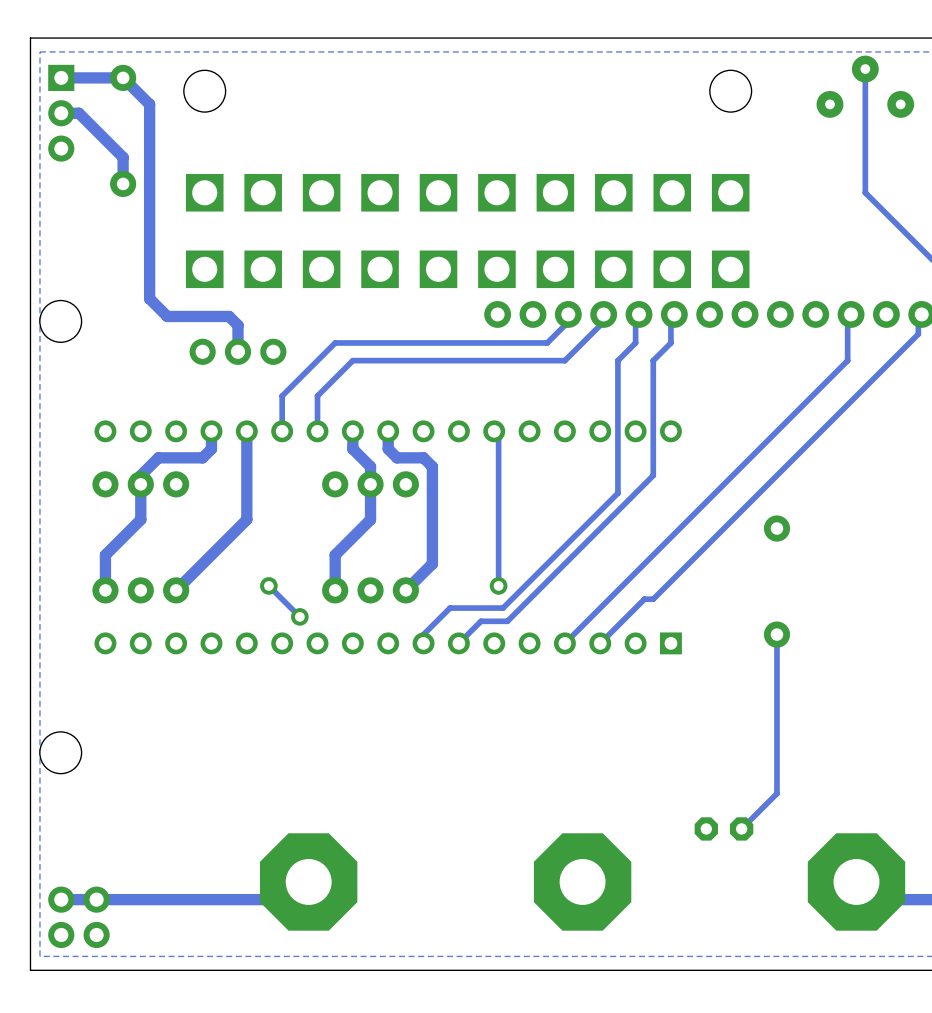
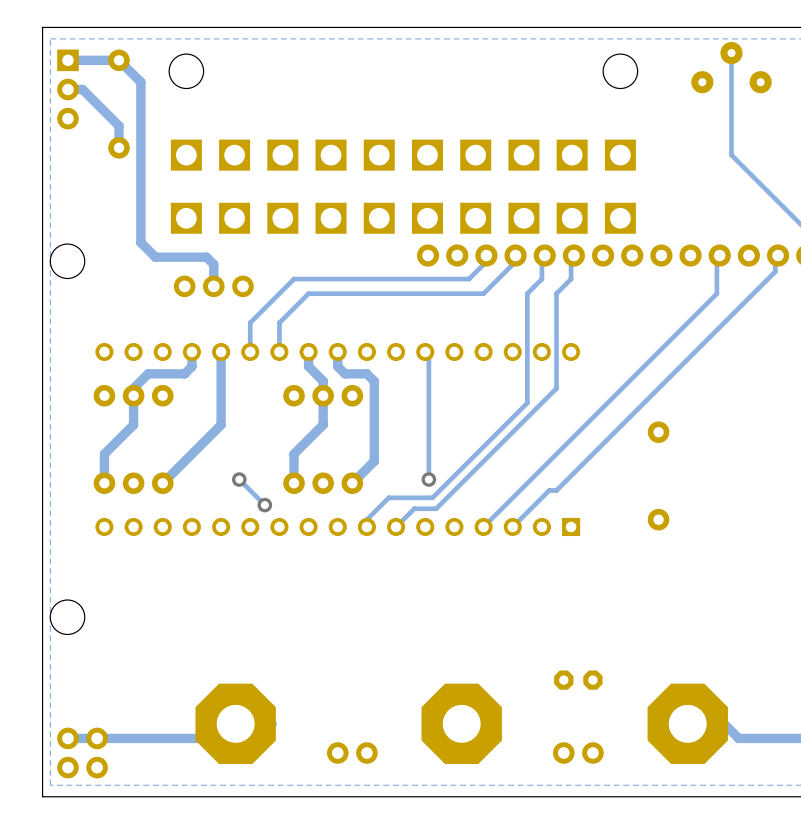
track: (776, 634) (776, 793) (741, 828) -> none
part position: (723, 828) -> (578, 680)
part position: (308, 881) -> (235, 723)
part position: (582, 881) -> (461, 723)
part position: (856, 881) -> (687, 723)
part: none -> (352, 753)
part: none -> (578, 753)

